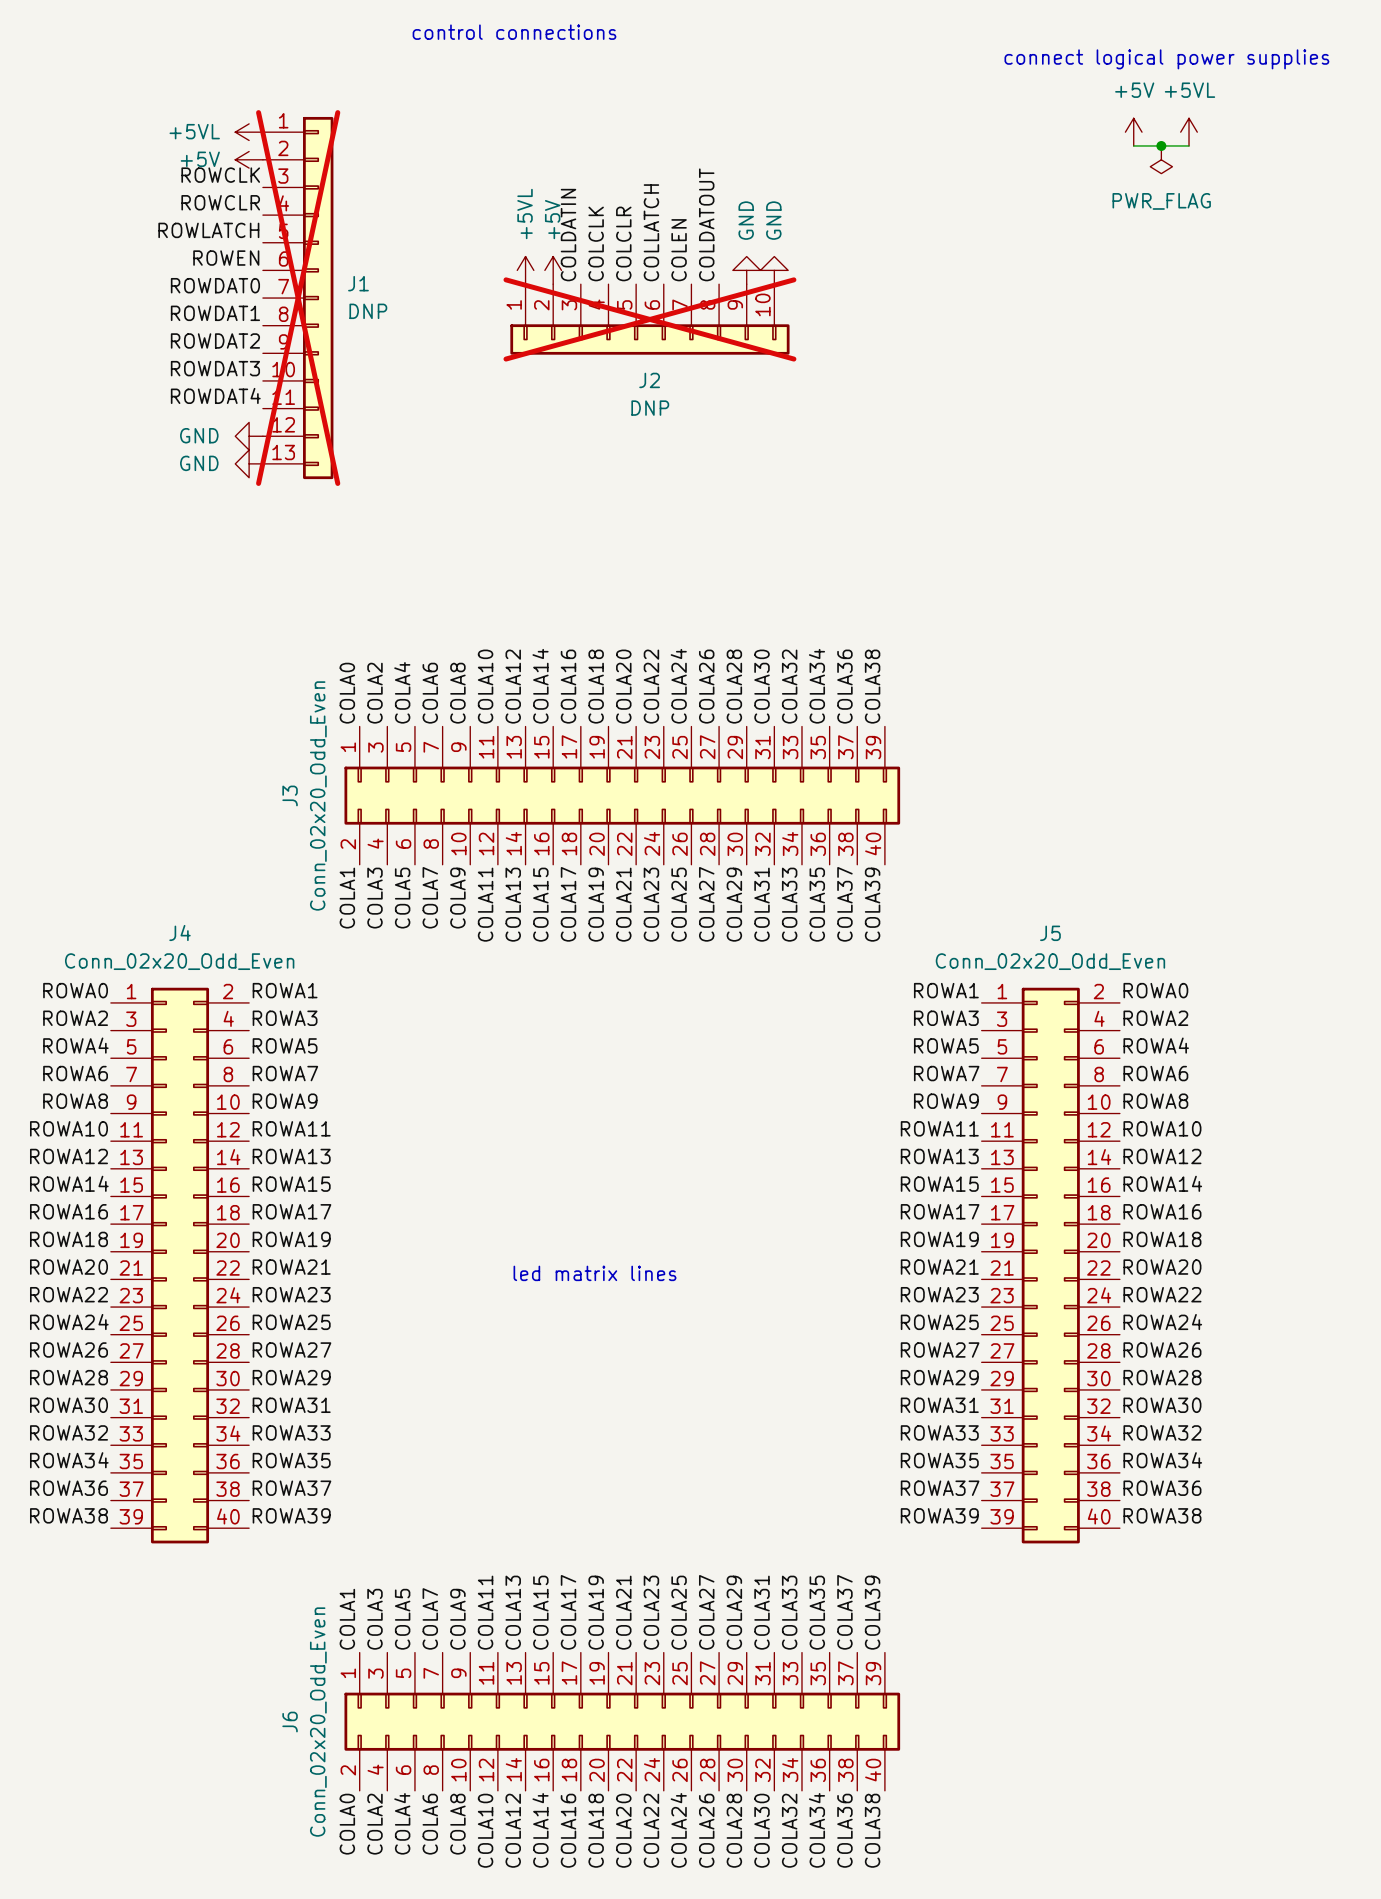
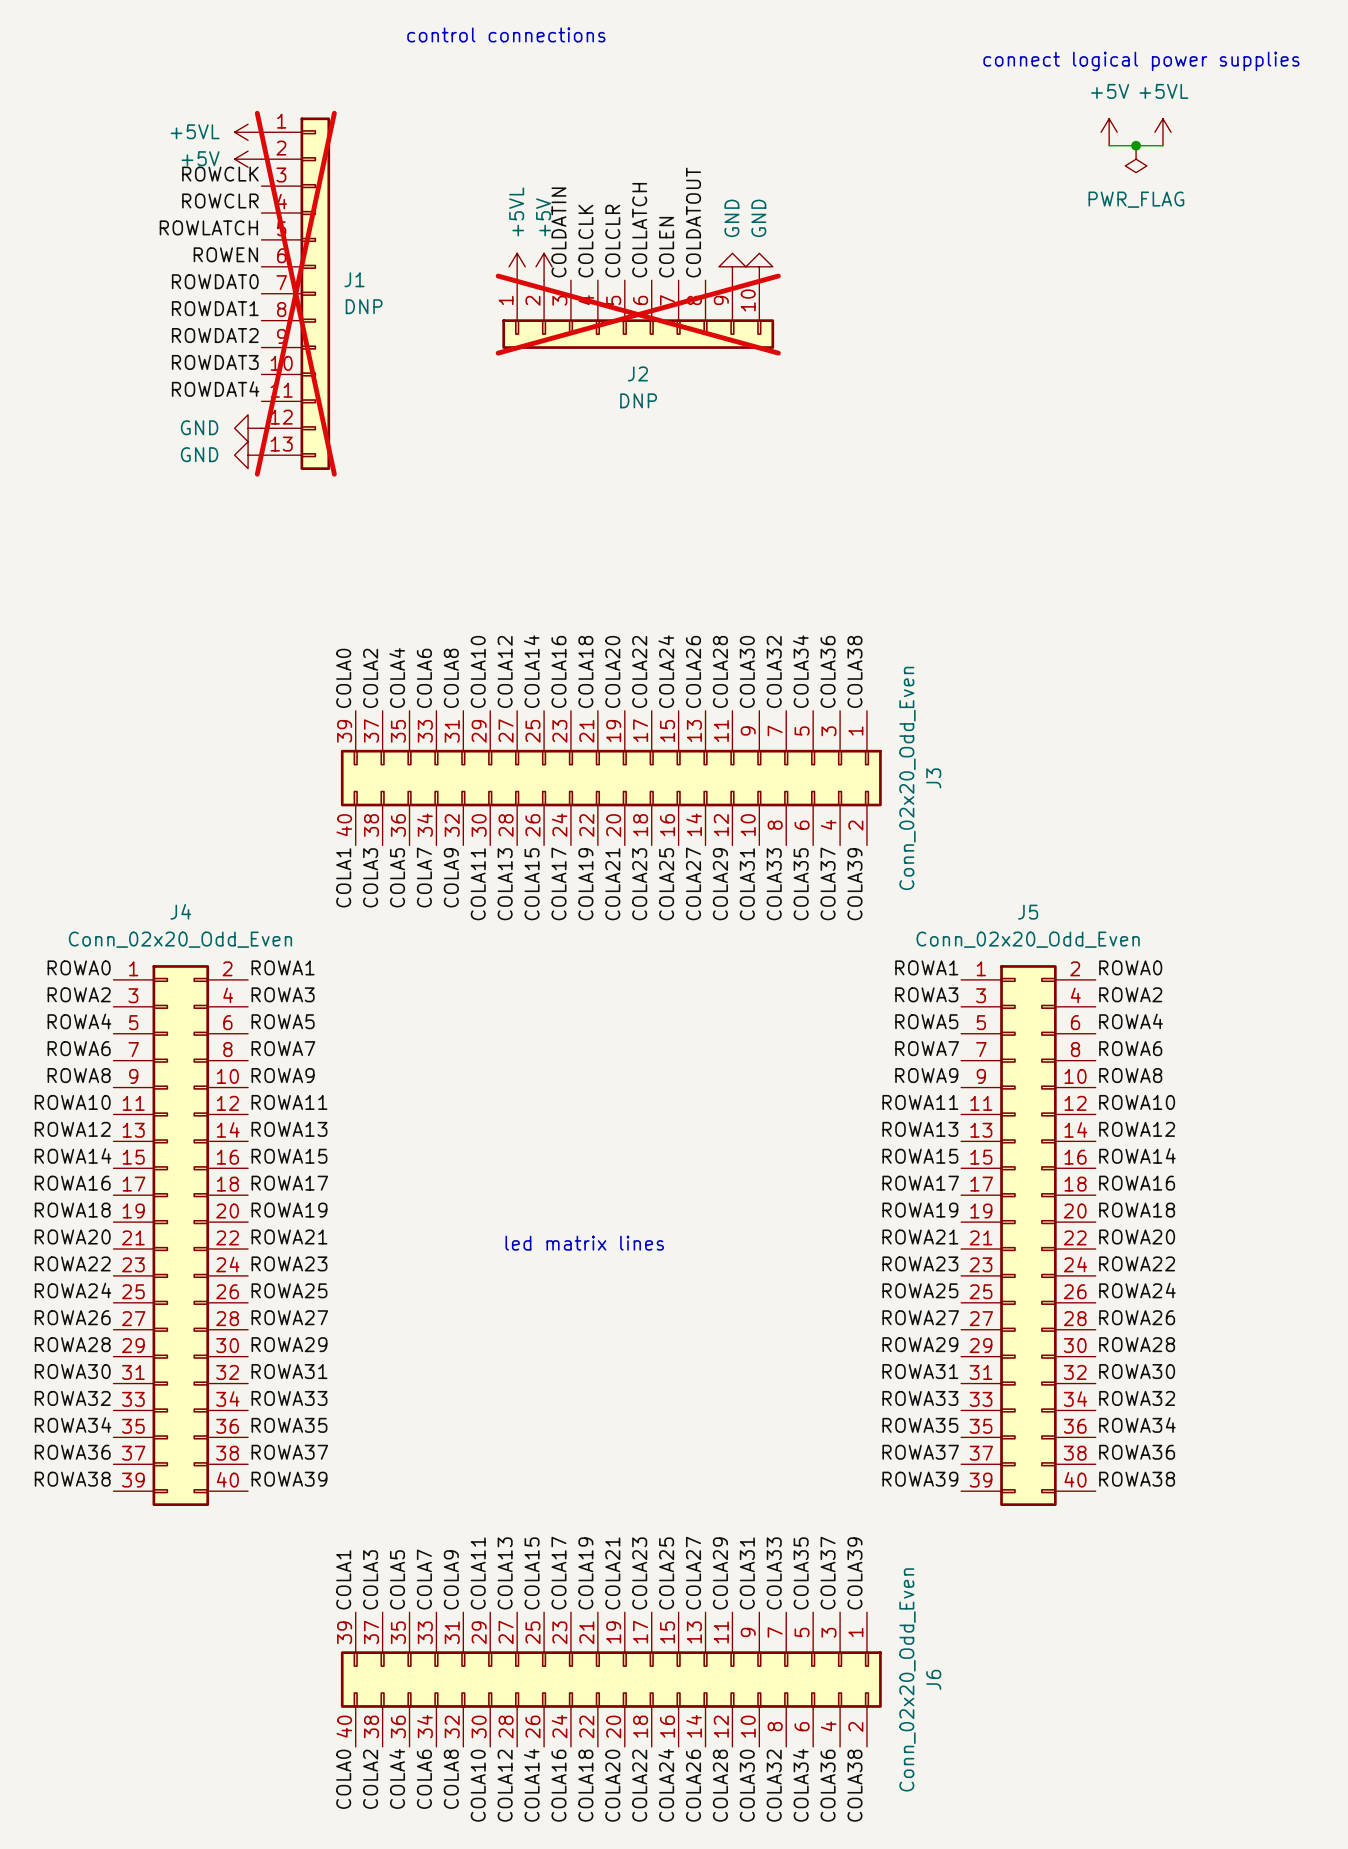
J3 flip: as is (622, 795) -> left-right (611, 778)
J6 flip: as is (622, 1721) -> left-right (611, 1679)

